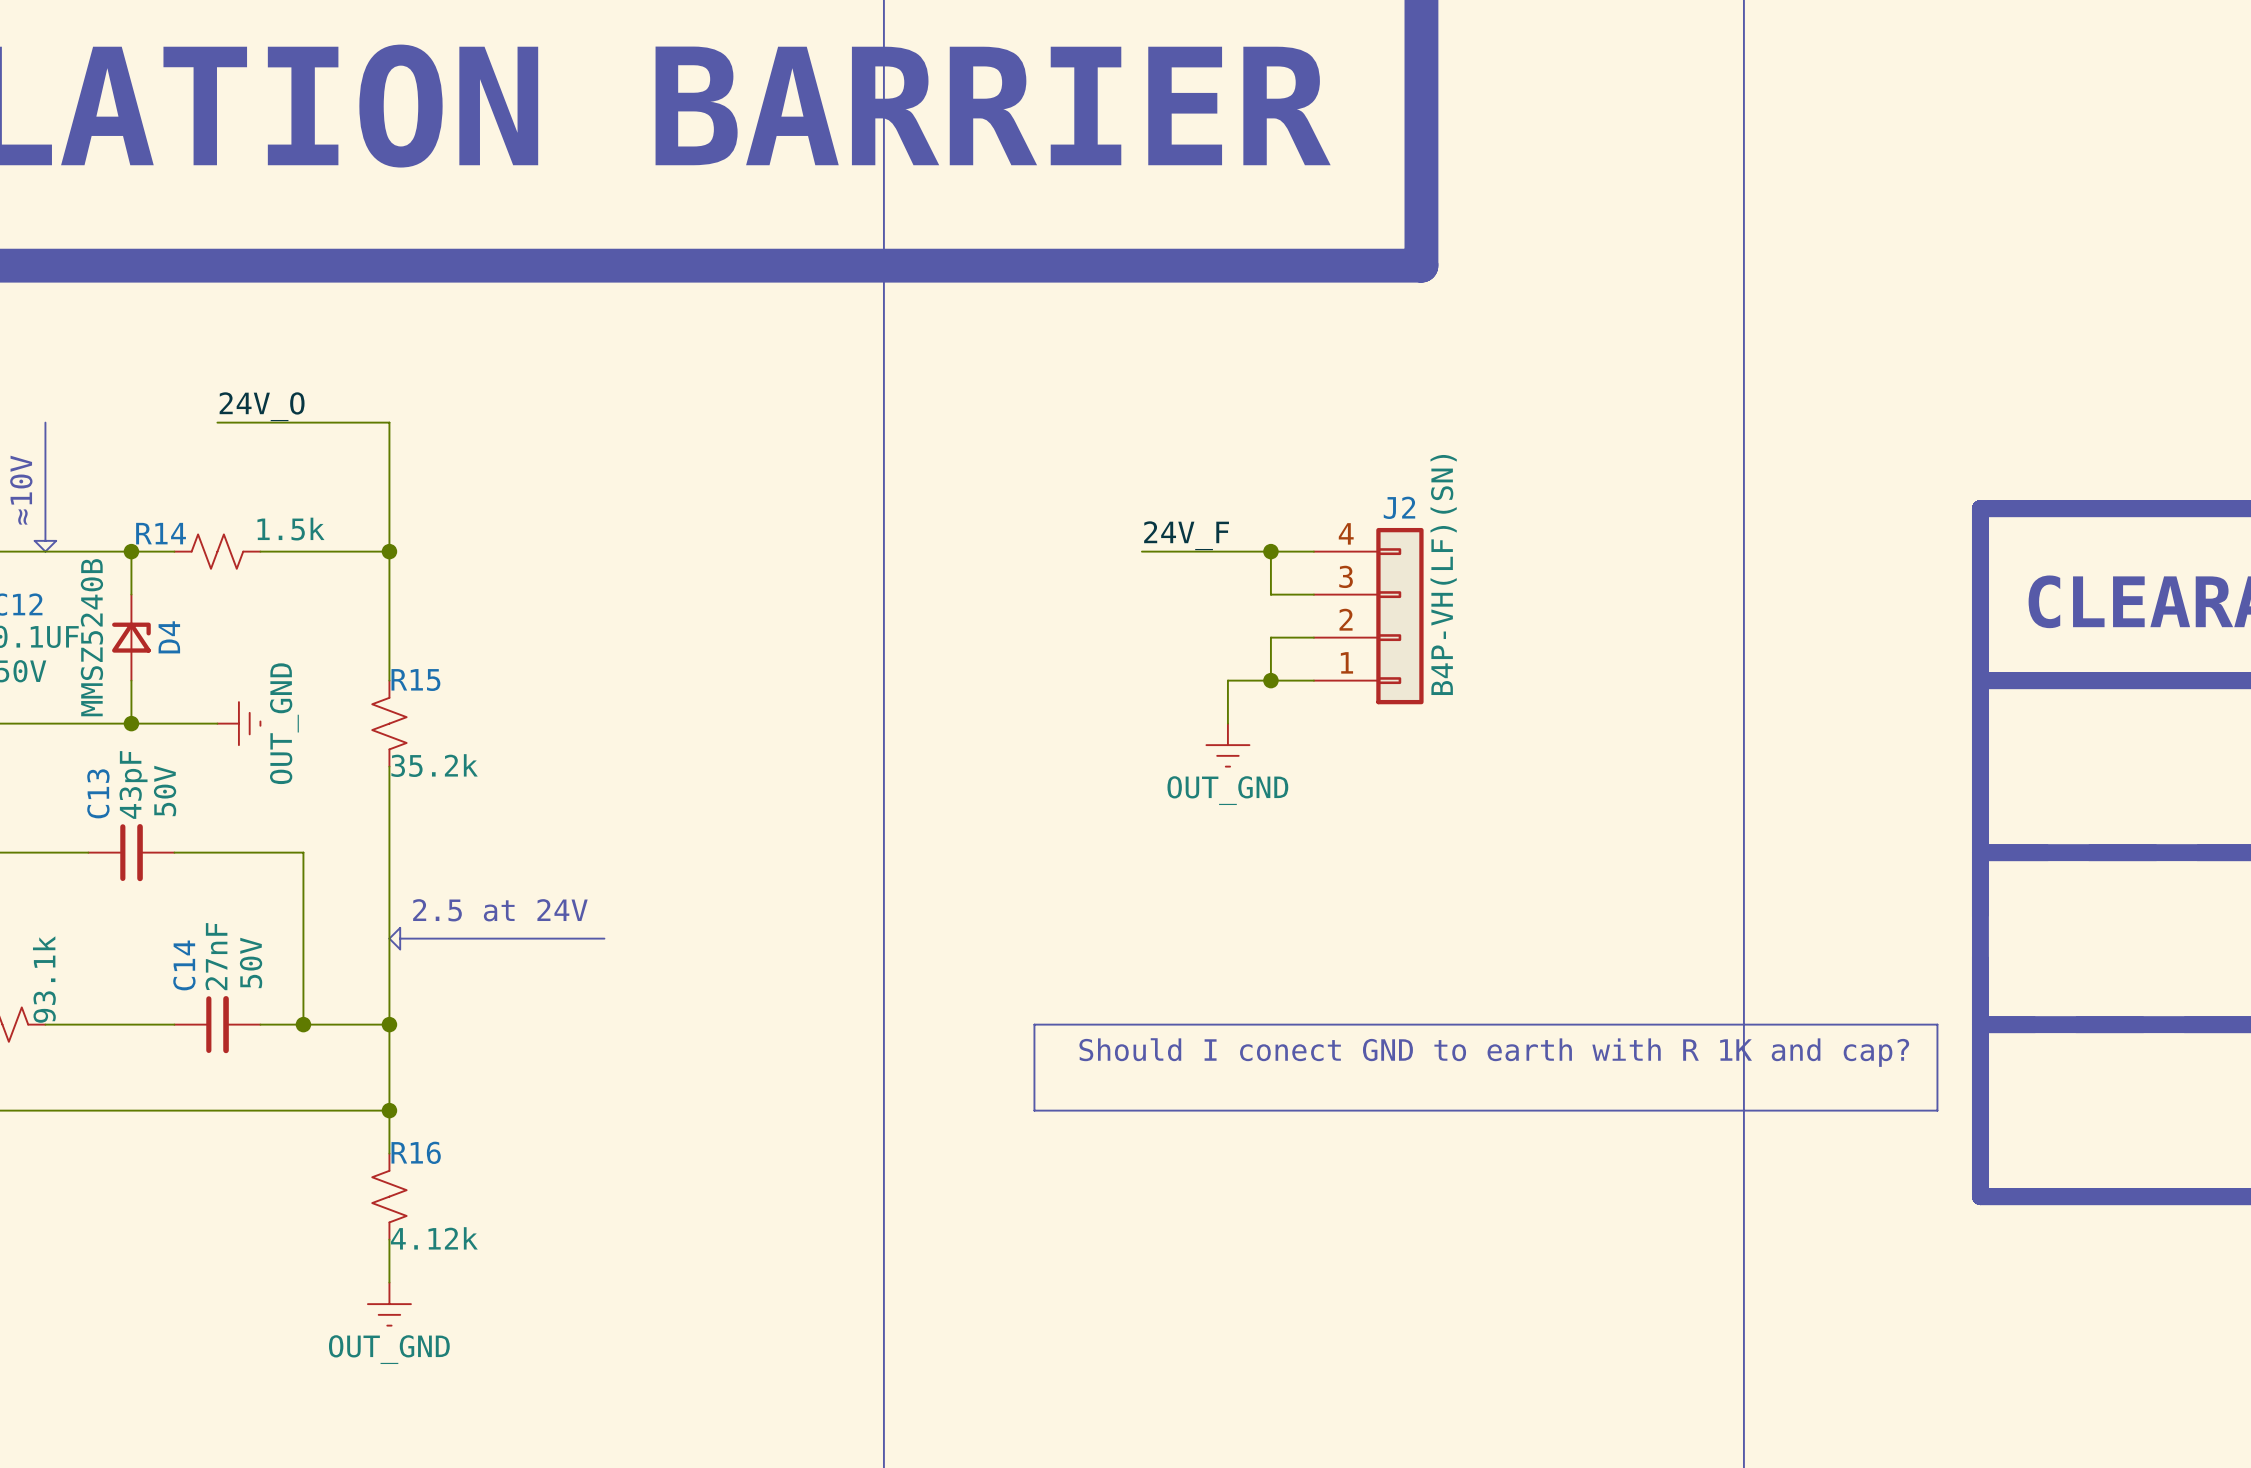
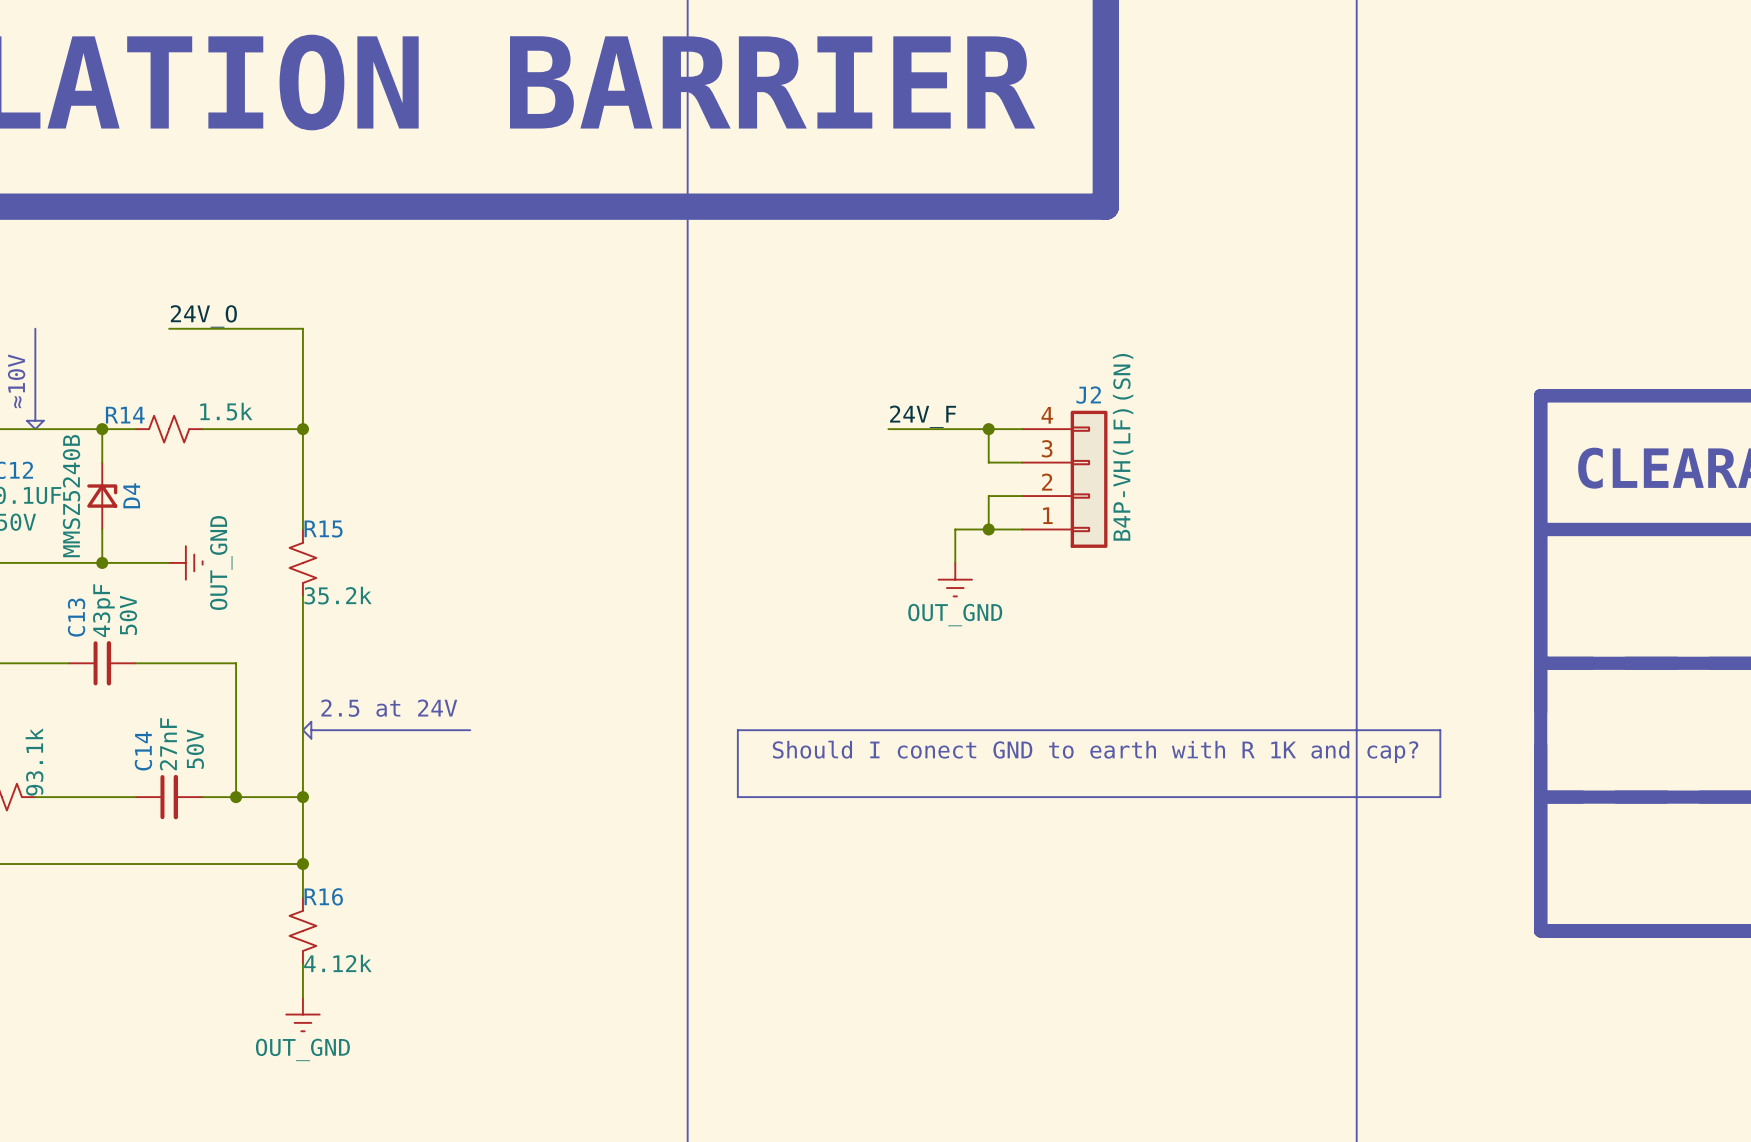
line: (1034, 1024) (1034, 1110) (1937, 1110) (1937, 1024) (1851, 1024) -> (804, 797) (737, 797) (737, 730) (1440, 730) (1440, 797)
text position: Should I conect GND to earth with R 1K and cap? (1494, 1052) -> Should I conect GND to earth with R 1K and cap? (1095, 751)

